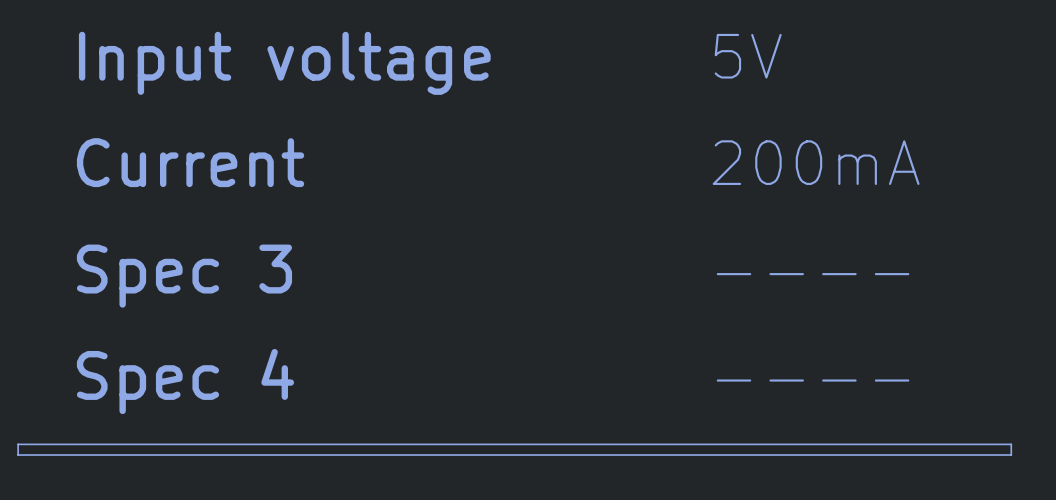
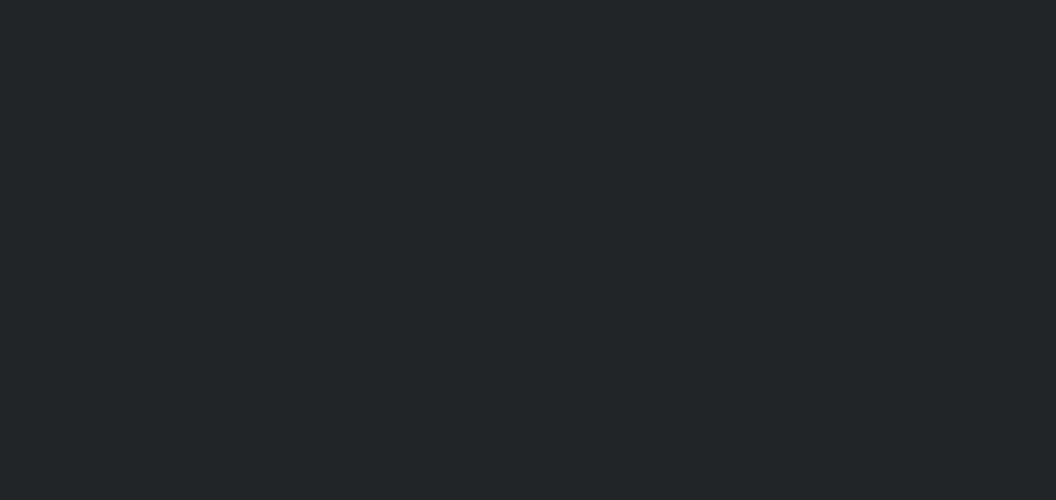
text: 5V (748, 56) -> none
text: Input voltage (284, 63) -> none
text: Current (190, 162) -> none
text: 200mA (816, 162) -> none
text: ---- (813, 274) -> none
text: Spec 3 (184, 276) -> none
text: ---- (813, 380) -> none
text: Spec 4 (185, 381) -> none
line: (18, 444) (1011, 444) (1011, 455) (18, 455) (18, 444) -> none

